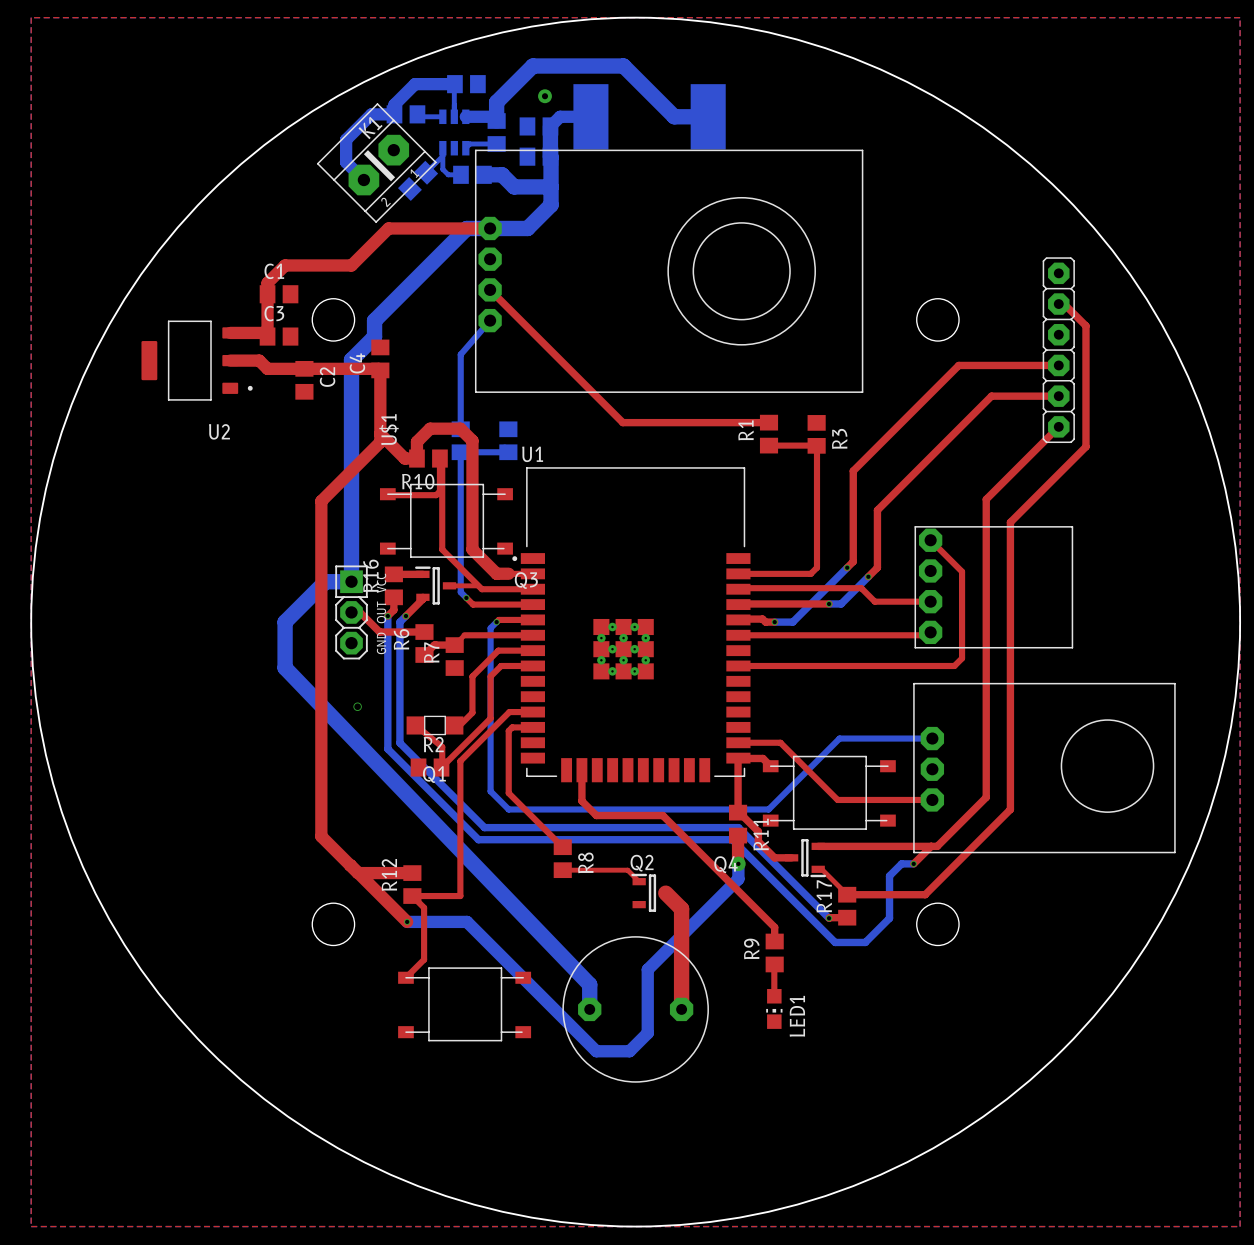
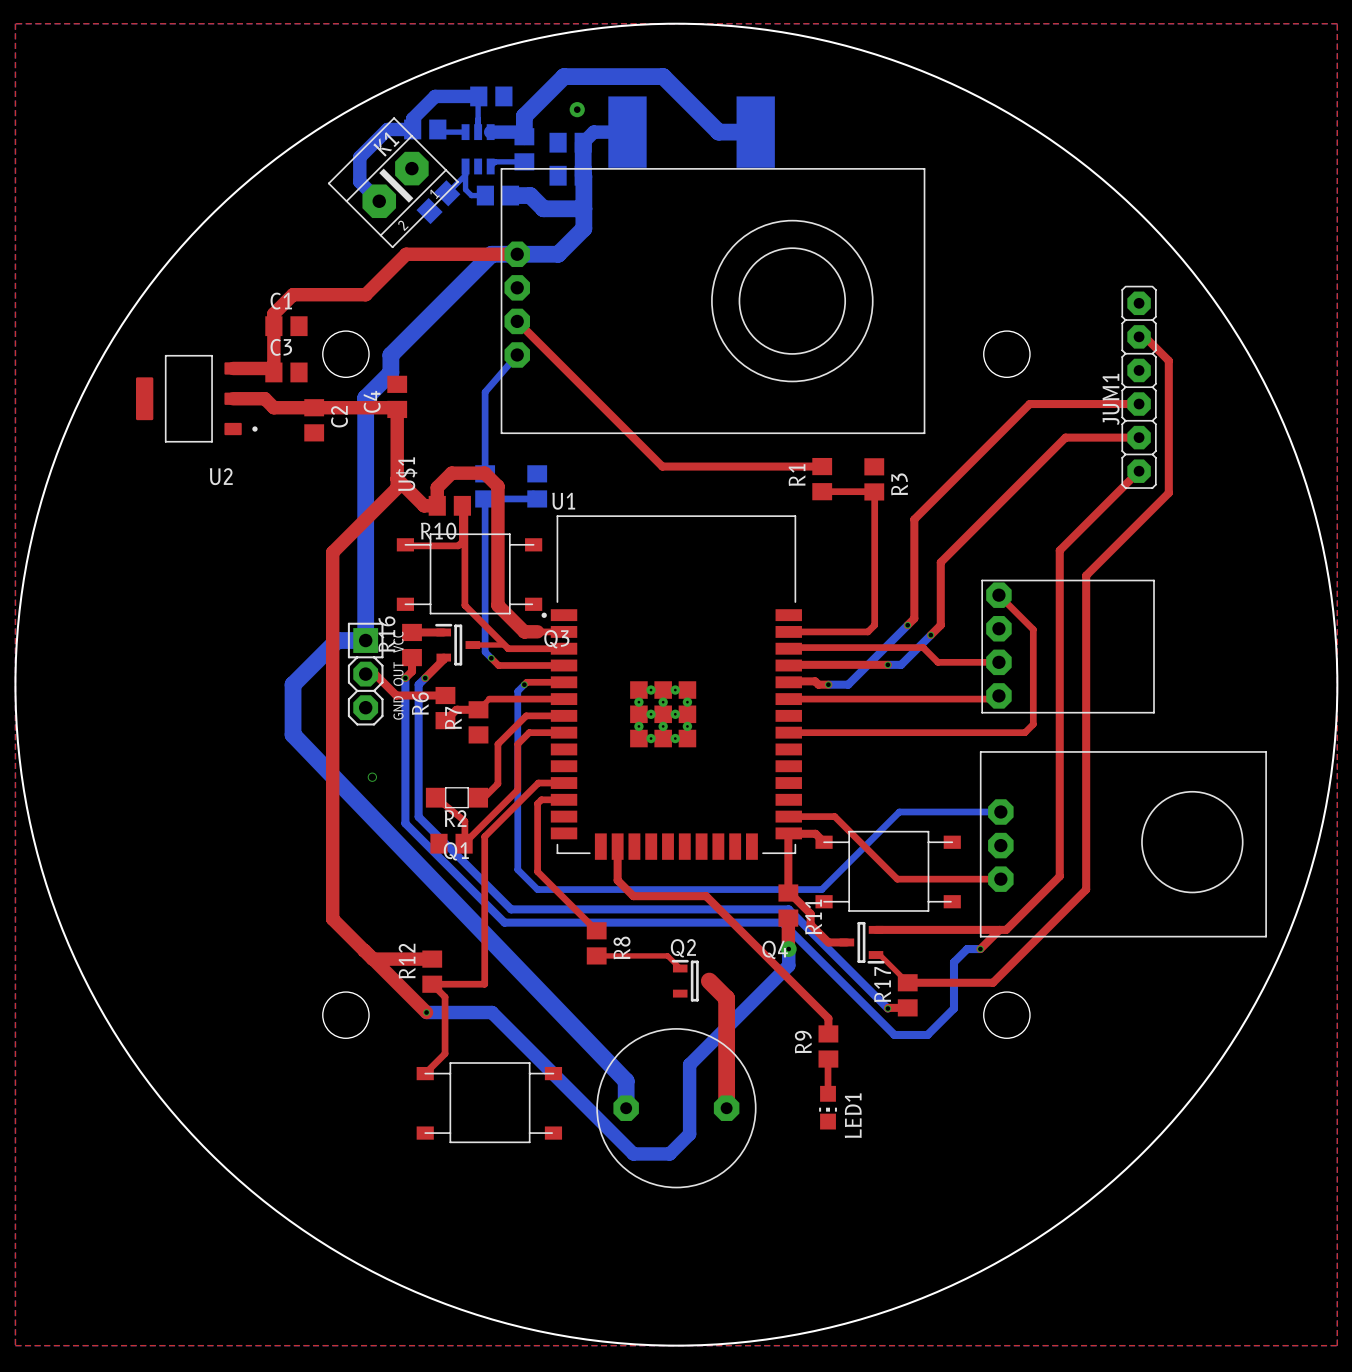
JUM1 name: none -> JUM1 (1111, 399)

